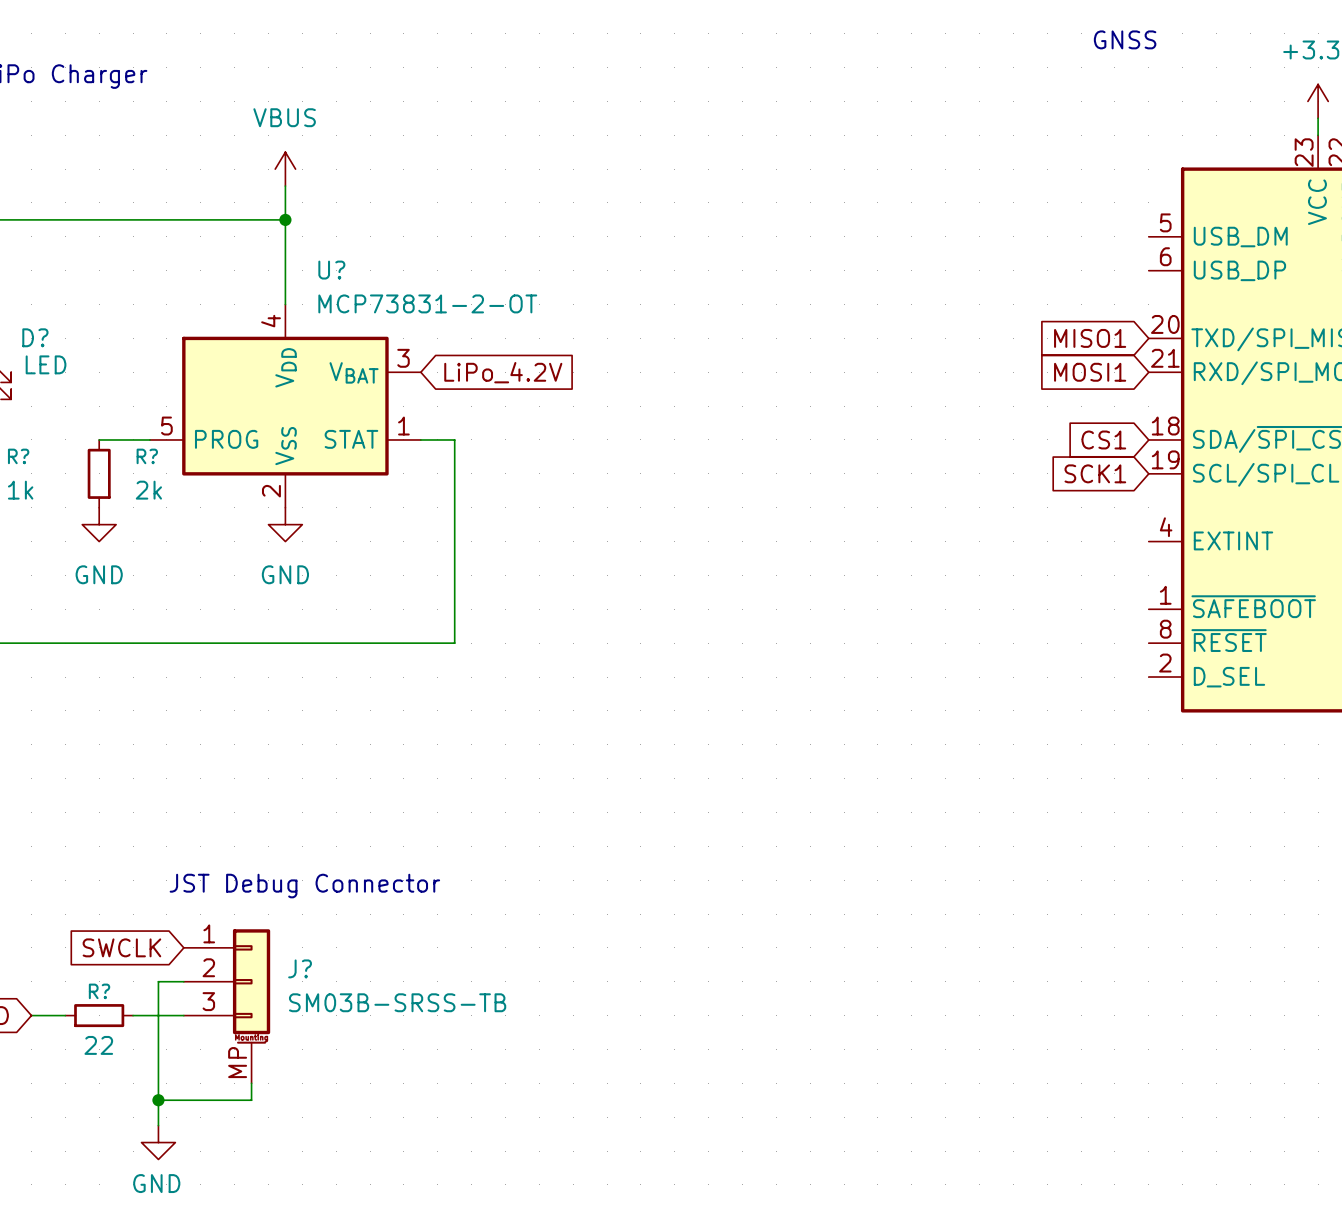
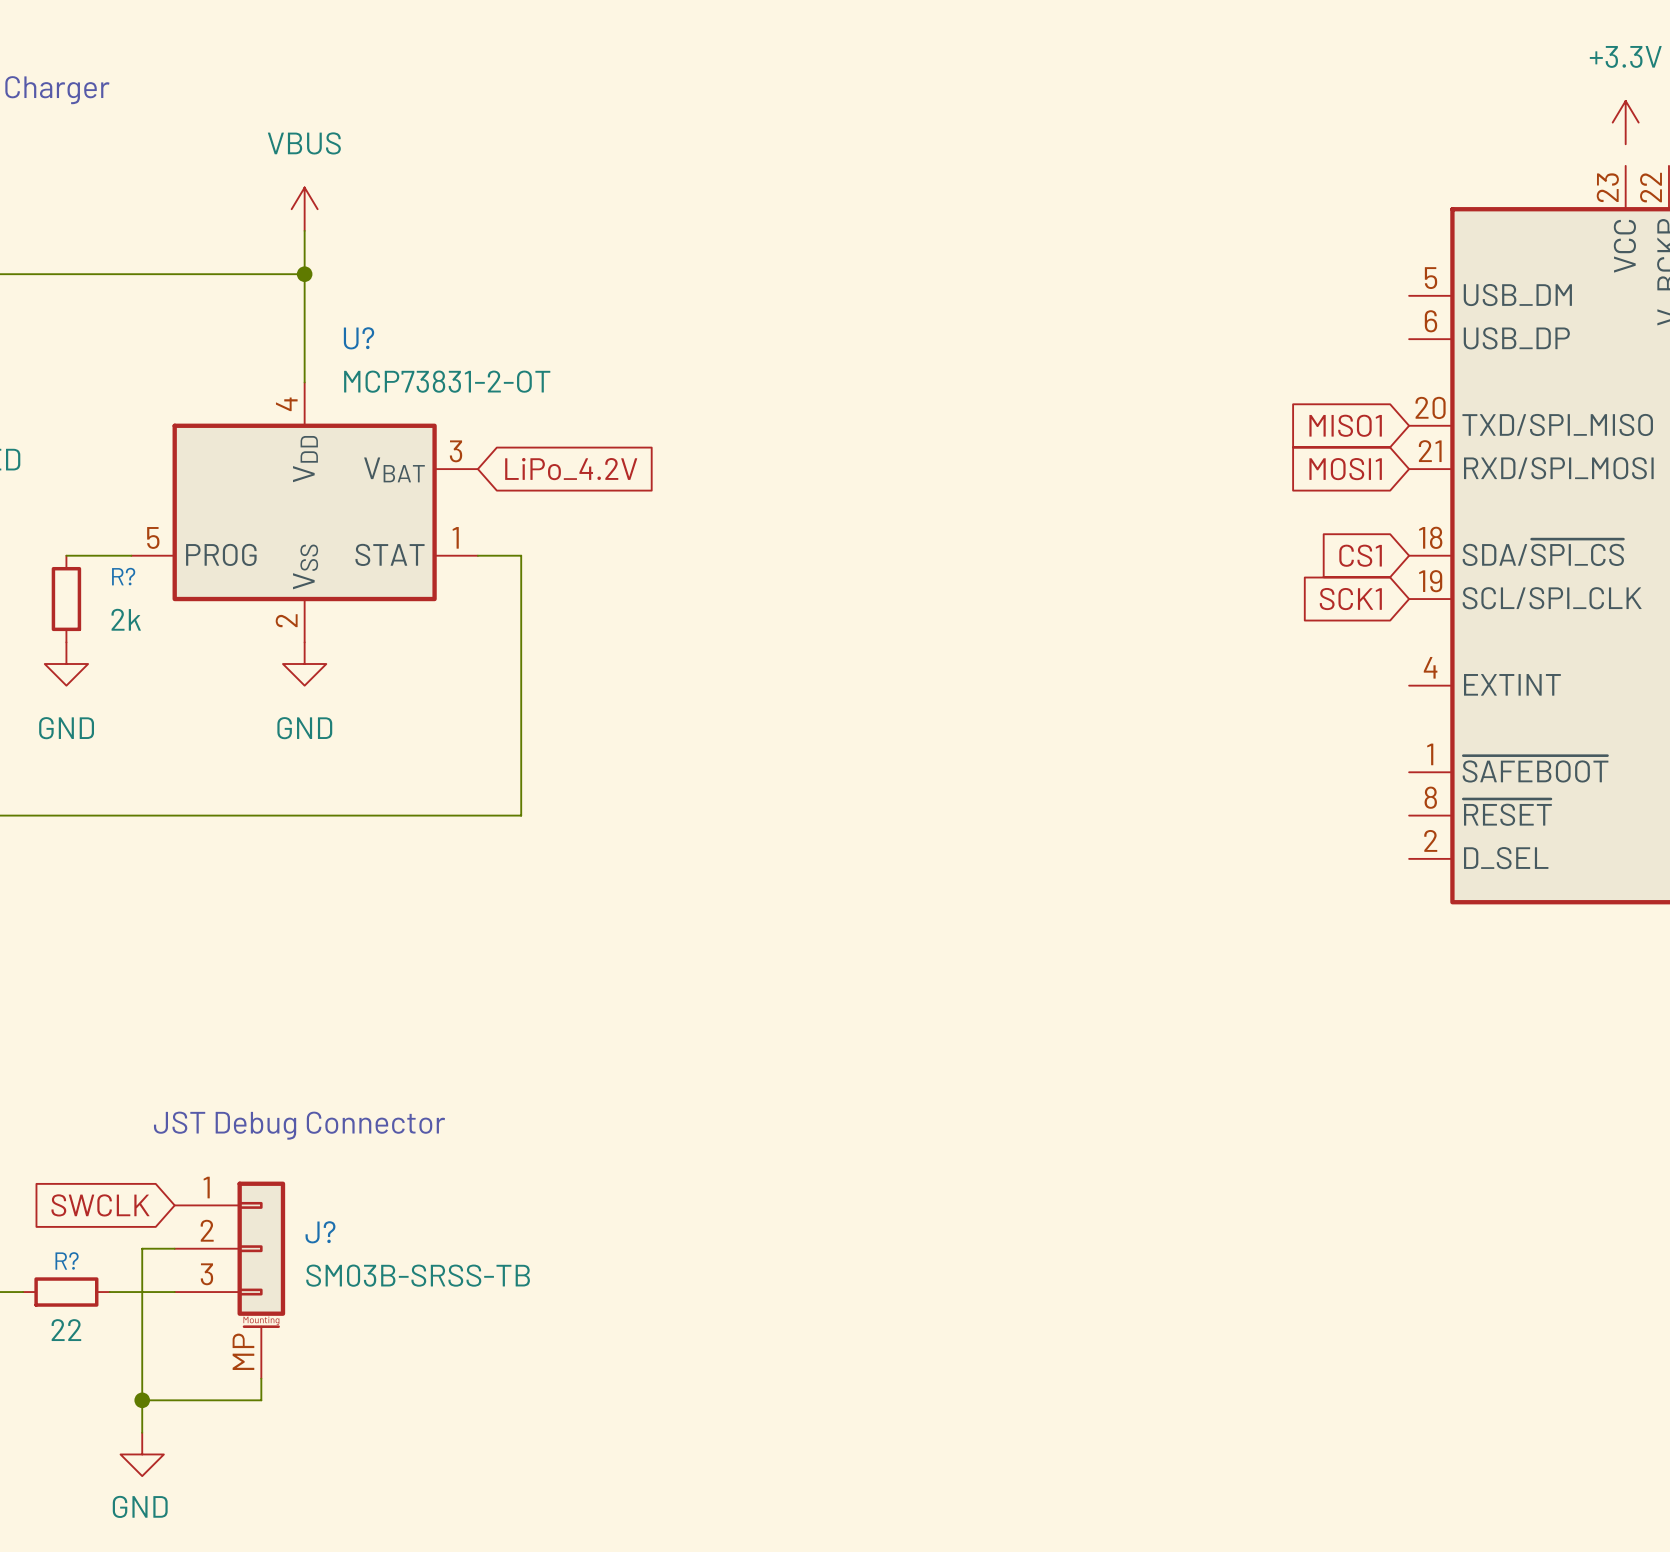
text: GNSS (1125, 39) -> none
wire: (1318, 118) (1318, 135) -> none

